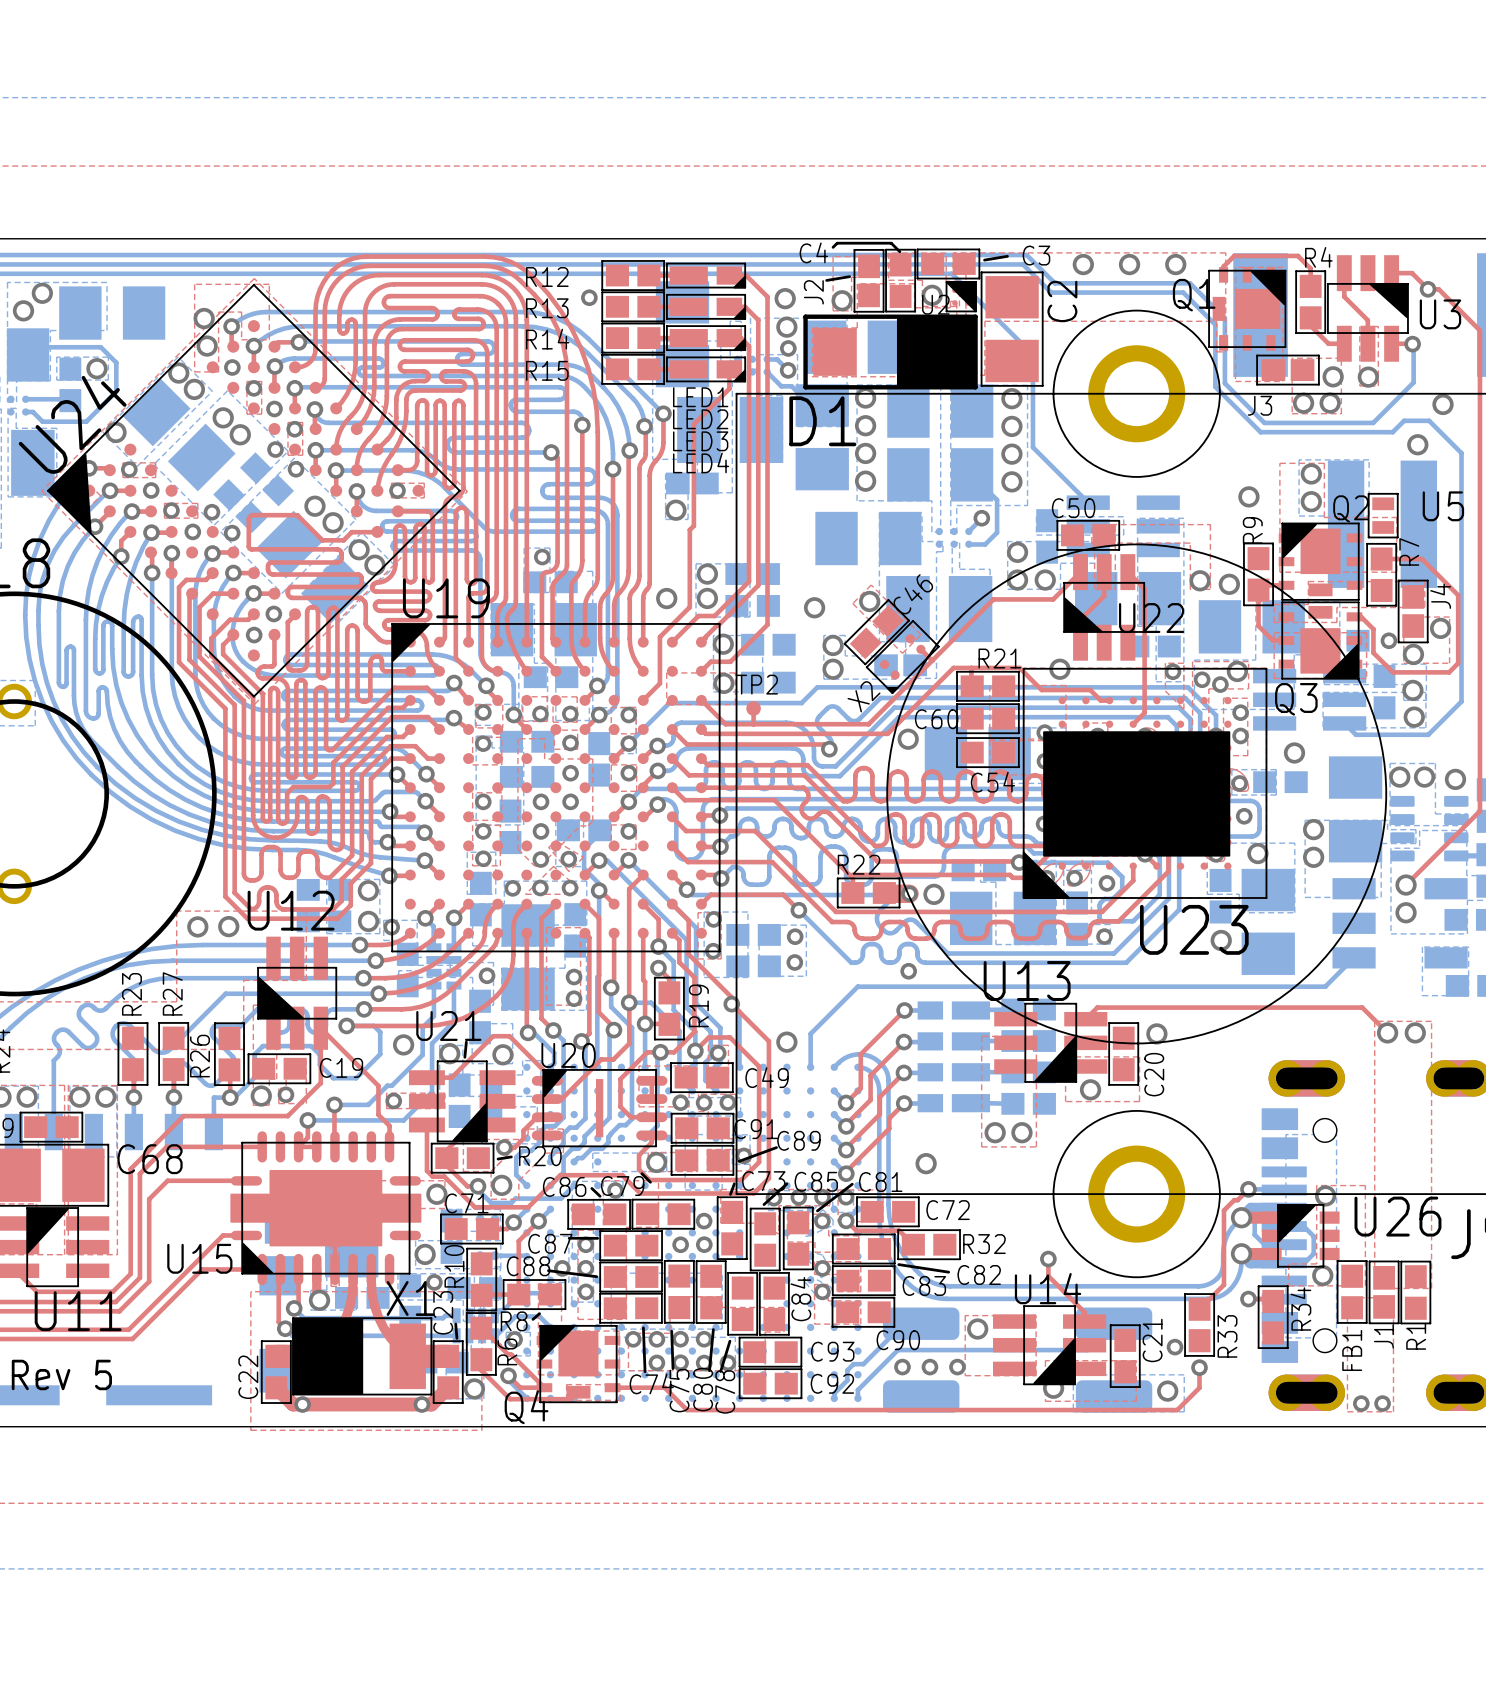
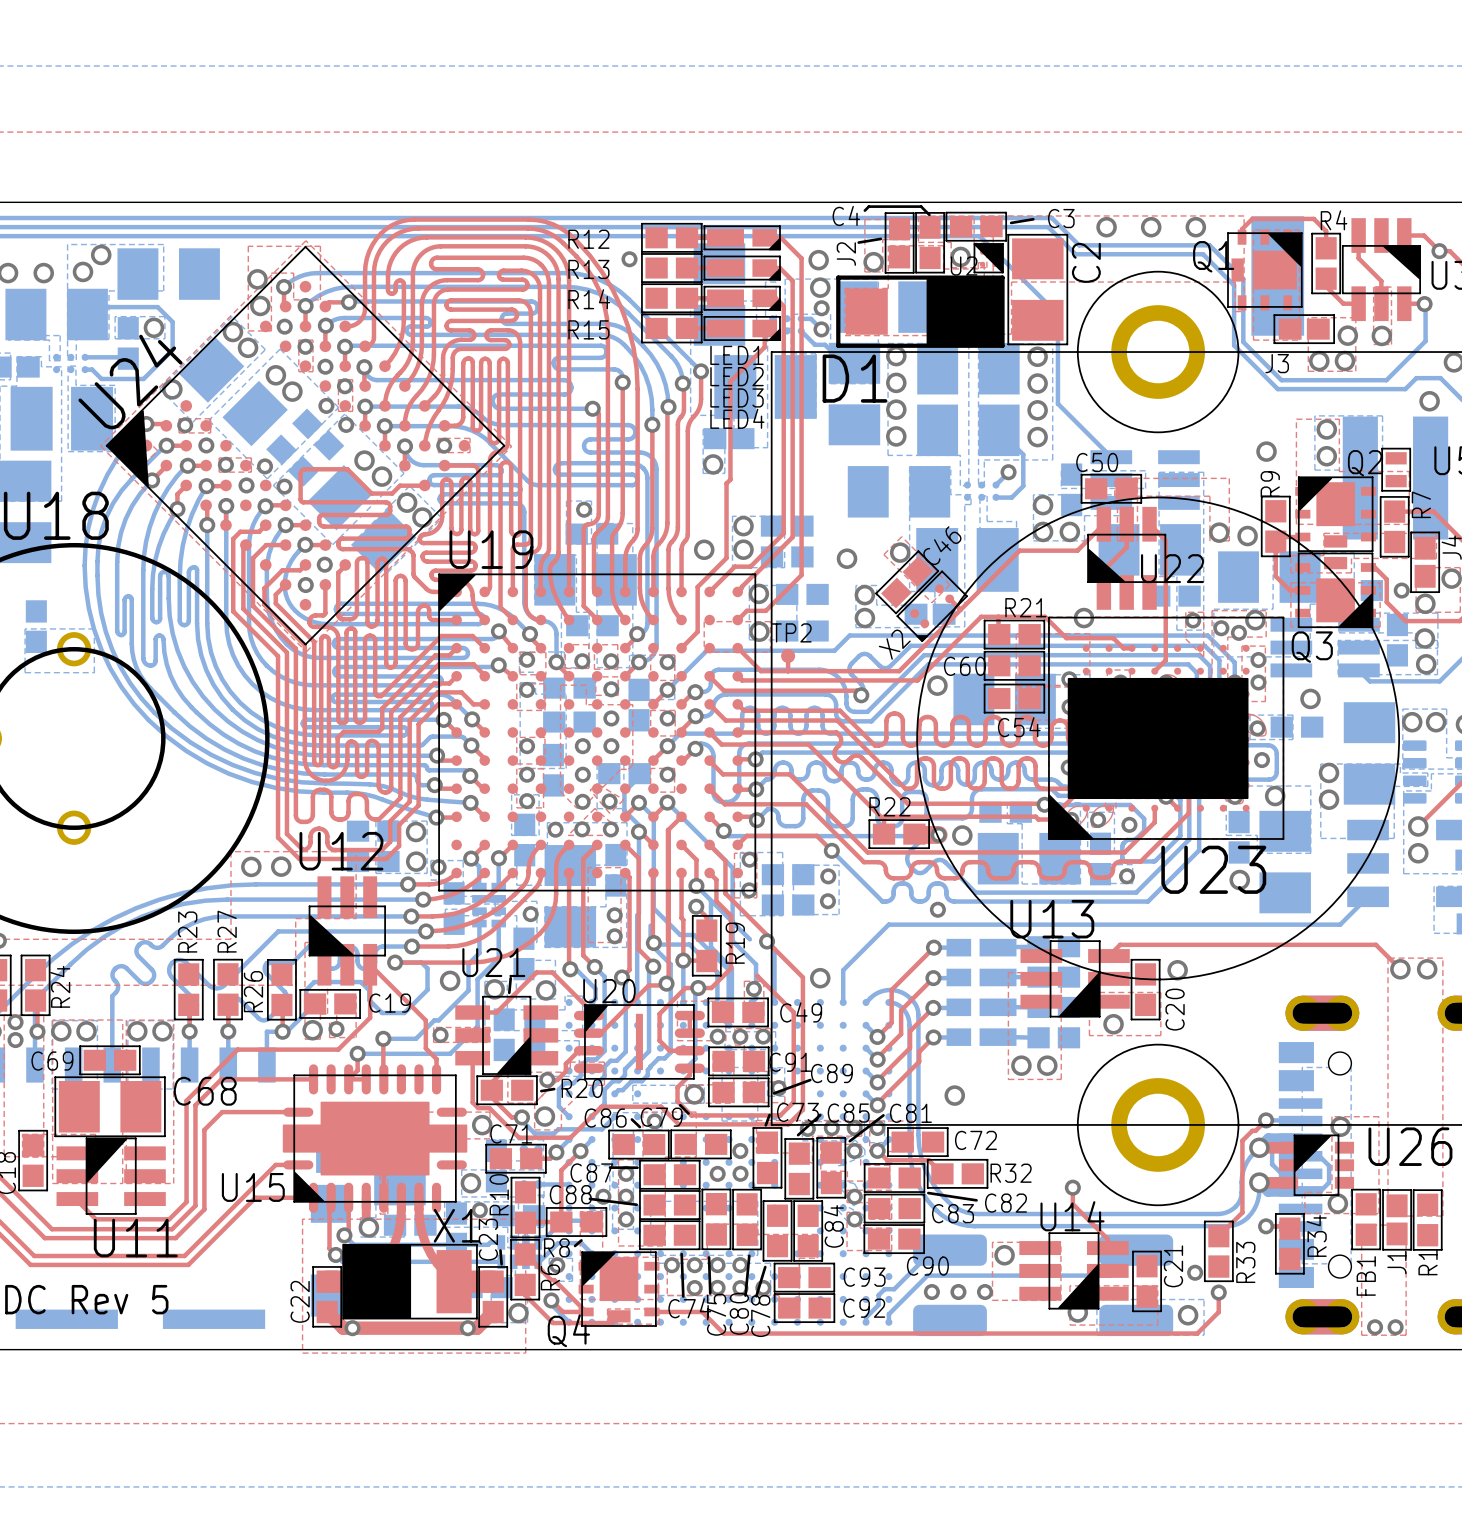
bottom track: (599, 860) (607, 860) (686, 939) (686, 1007) (710, 1031) (710, 1057) (705, 1062) (705, 1080) (716, 1090) -> (639, 802) (653, 817) (653, 908) (680, 935) (693, 935) (728, 969) (728, 1002)
top track: (614, 933) (614, 984) (611, 987) -> (653, 873) (653, 943)
via: (611, 987) -> none
bottom track: (629, 1002) (651, 1002) (679, 1031) (680, 1078) -> (653, 943) (689, 944) (717, 972) (717, 1013)
top track: (629, 1002) (629, 1043) (613, 1059) (601, 1059) (561, 1099) (547, 1099) -> (668, 829) (668, 981) (664, 985) (648, 985) (602, 1031) (589, 1033)
via position: (629, 1002) -> (653, 943)
via: none -> (666, 983)
top track: (695, 1050) (708, 1037) (730, 1037) (759, 1066) (759, 1162) (741, 1180) (649, 1180) -> (757, 976) (793, 1012) (793, 1102) (780, 1115) (691, 1115) (687, 1111)
via: (695, 1050) -> none

